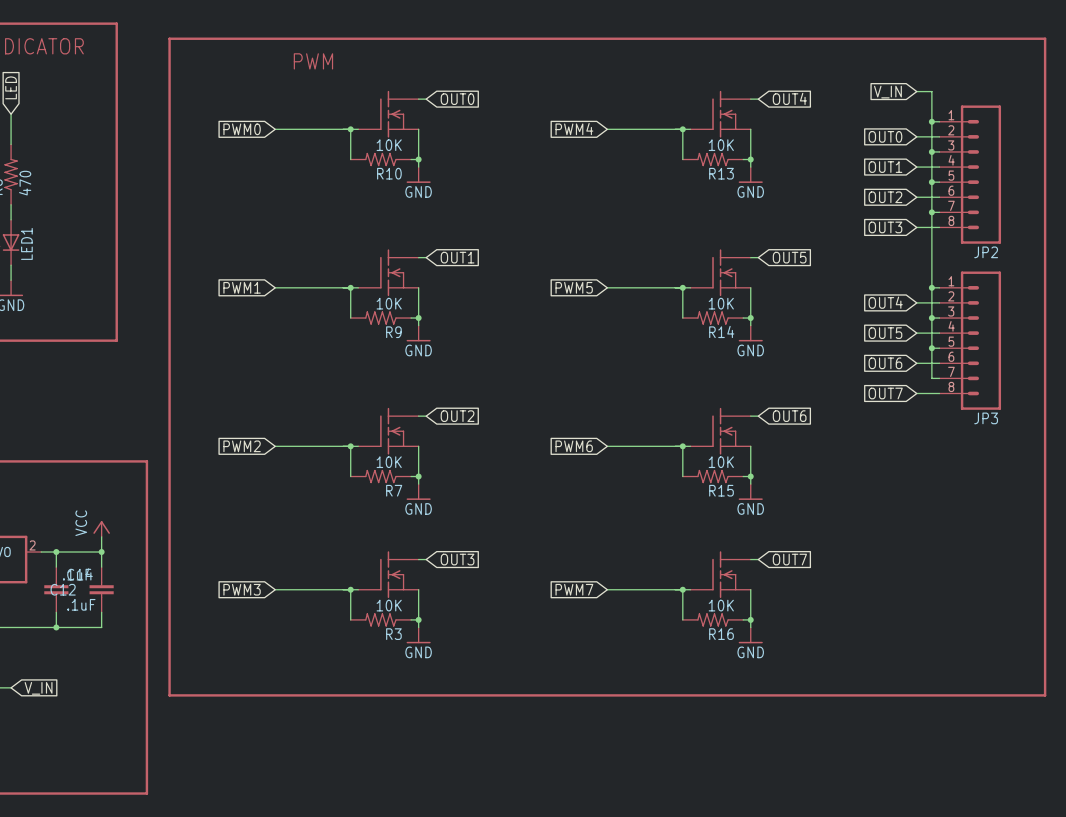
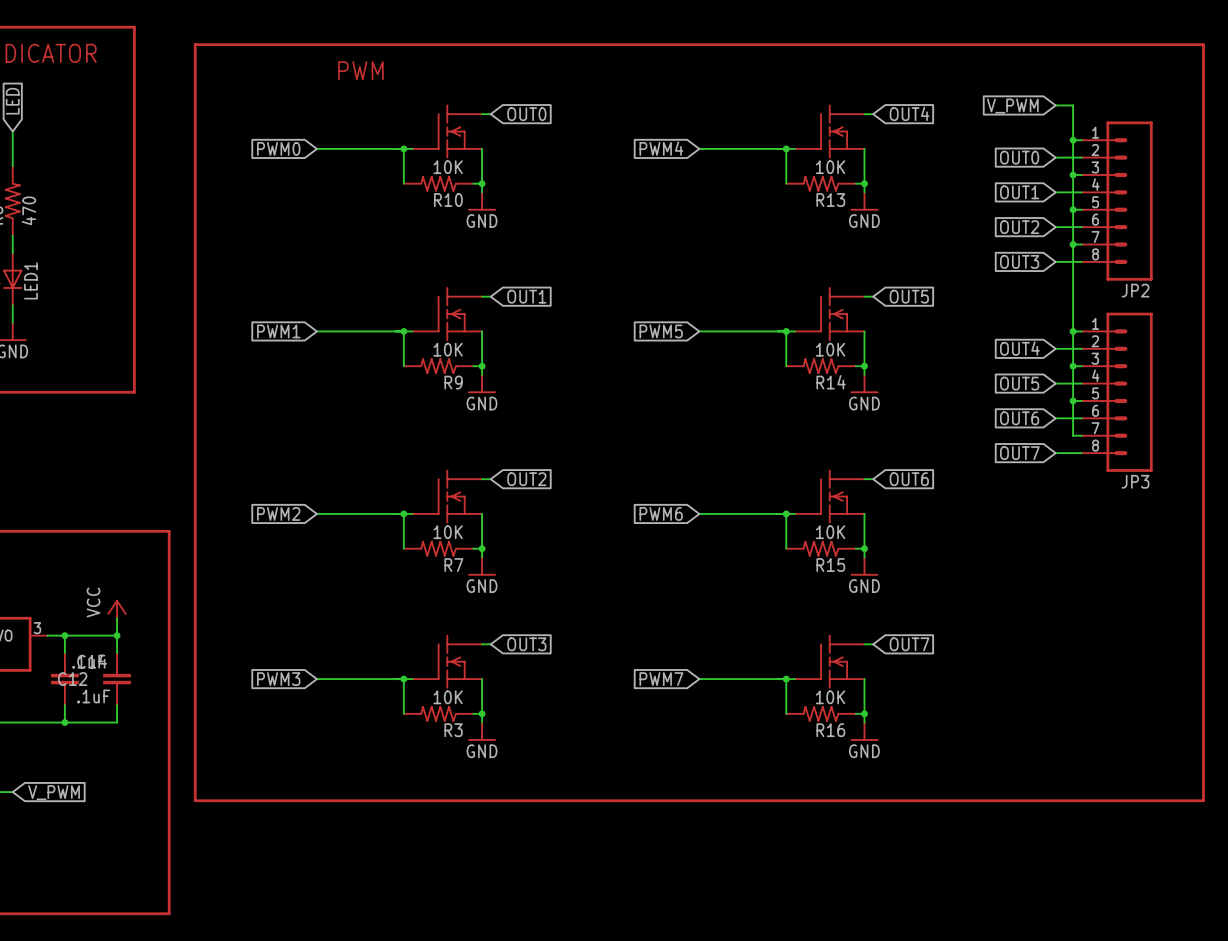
global label: V_IN (887, 92) -> V_PWM (1012, 106)
part pin number: 2 (32, 545) -> 3 (37, 628)
global label: V_IN (38, 688) -> V_PWM (54, 792)

